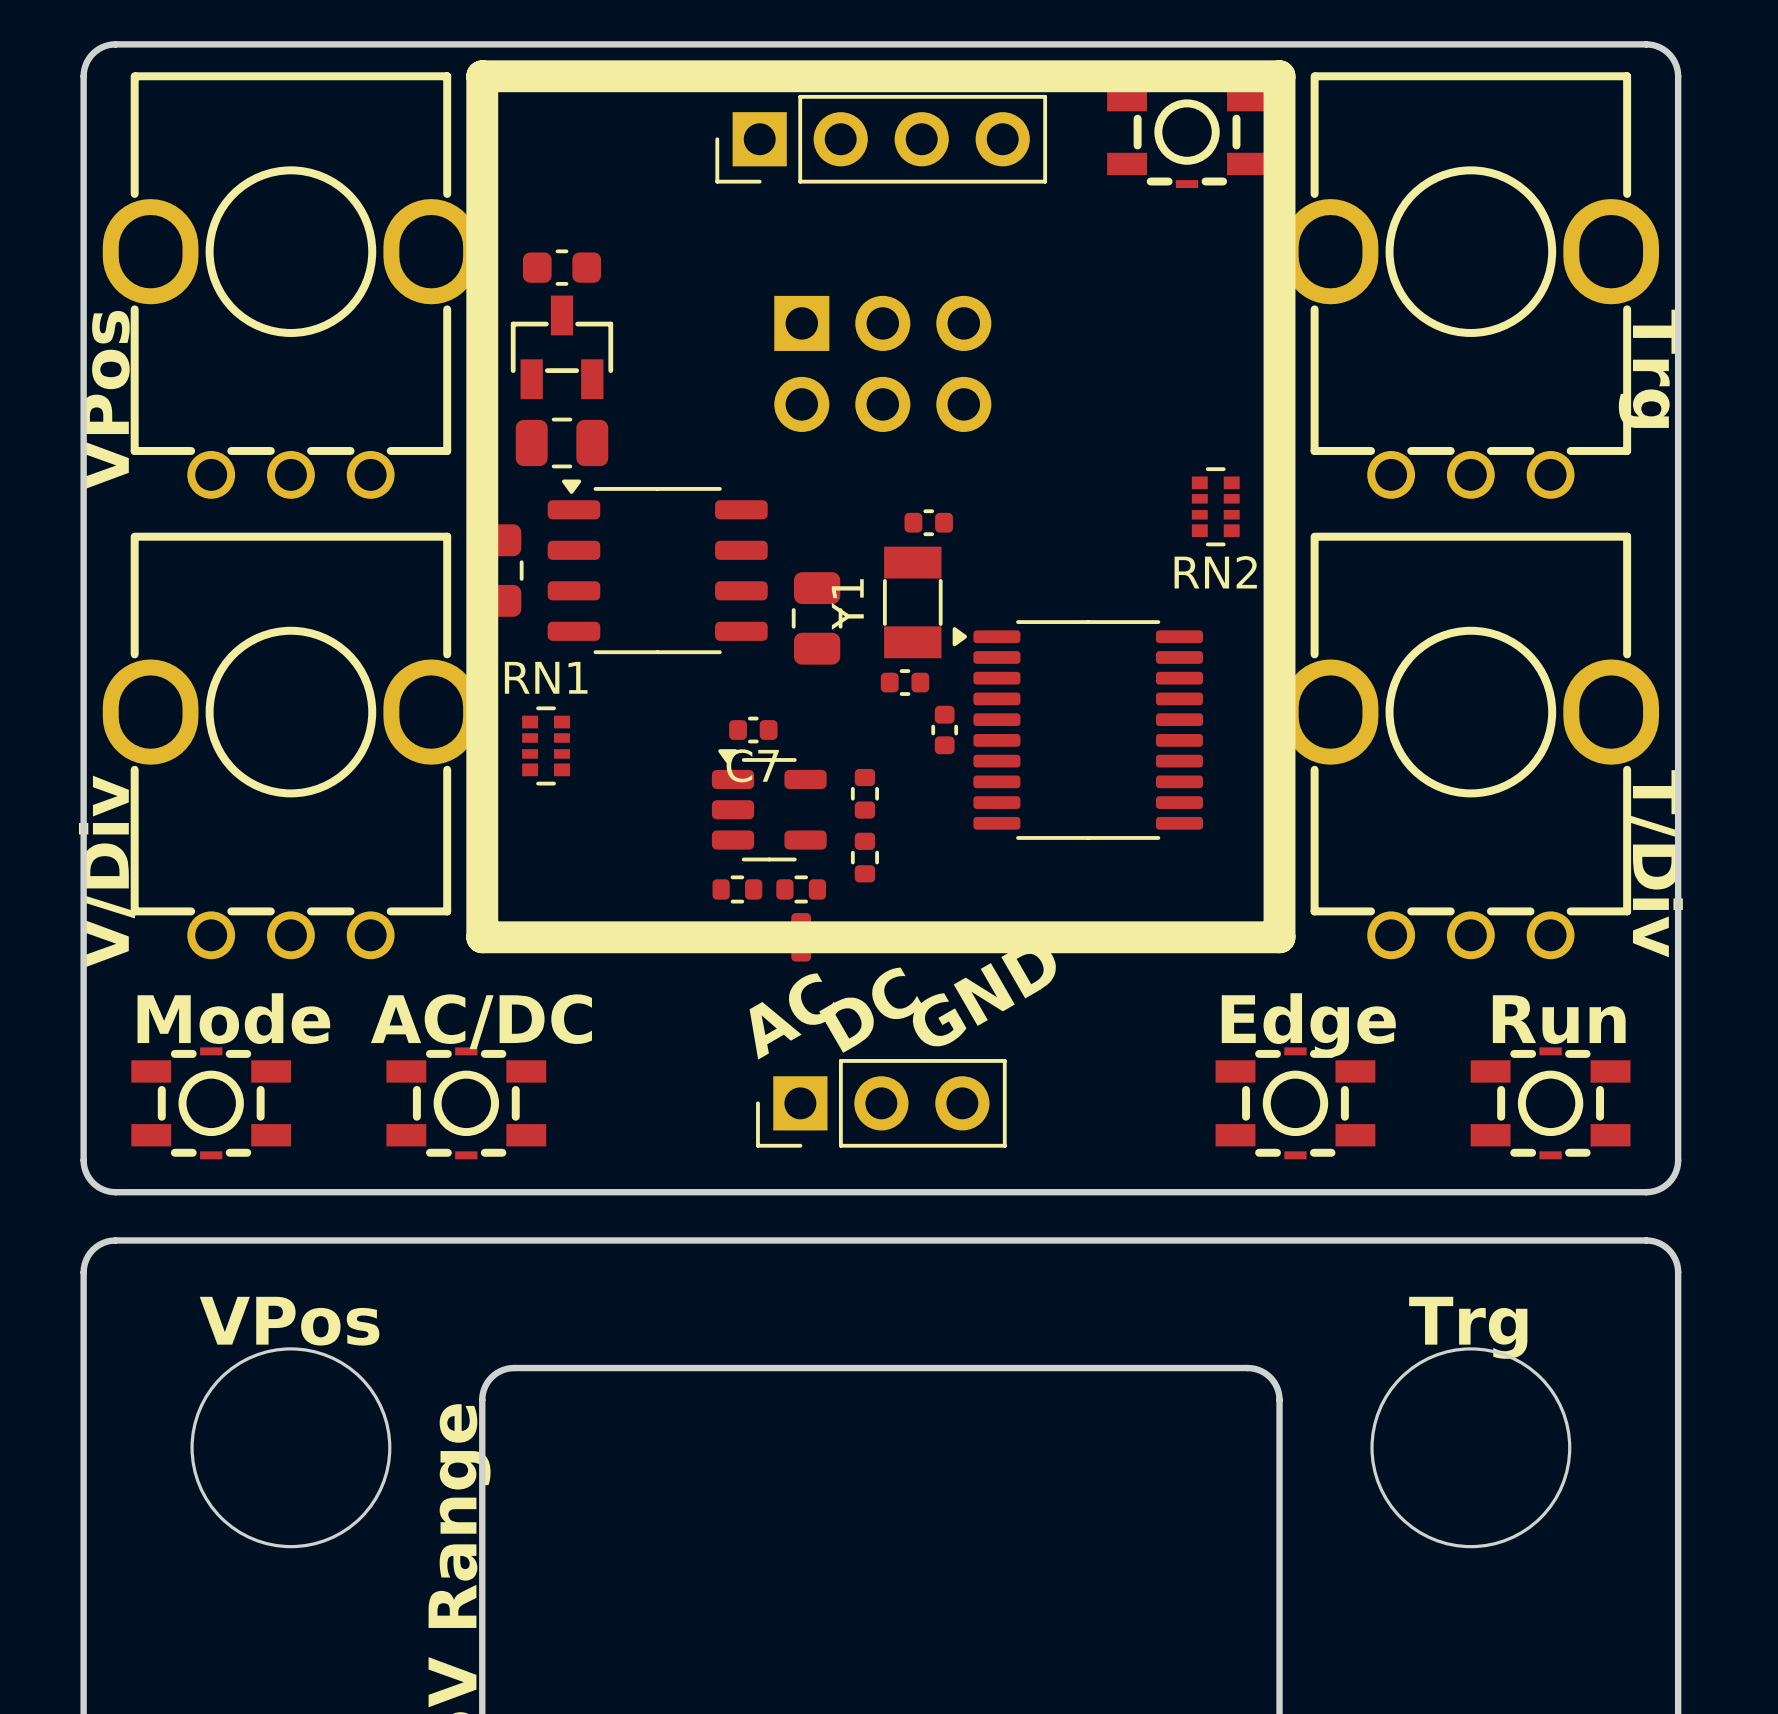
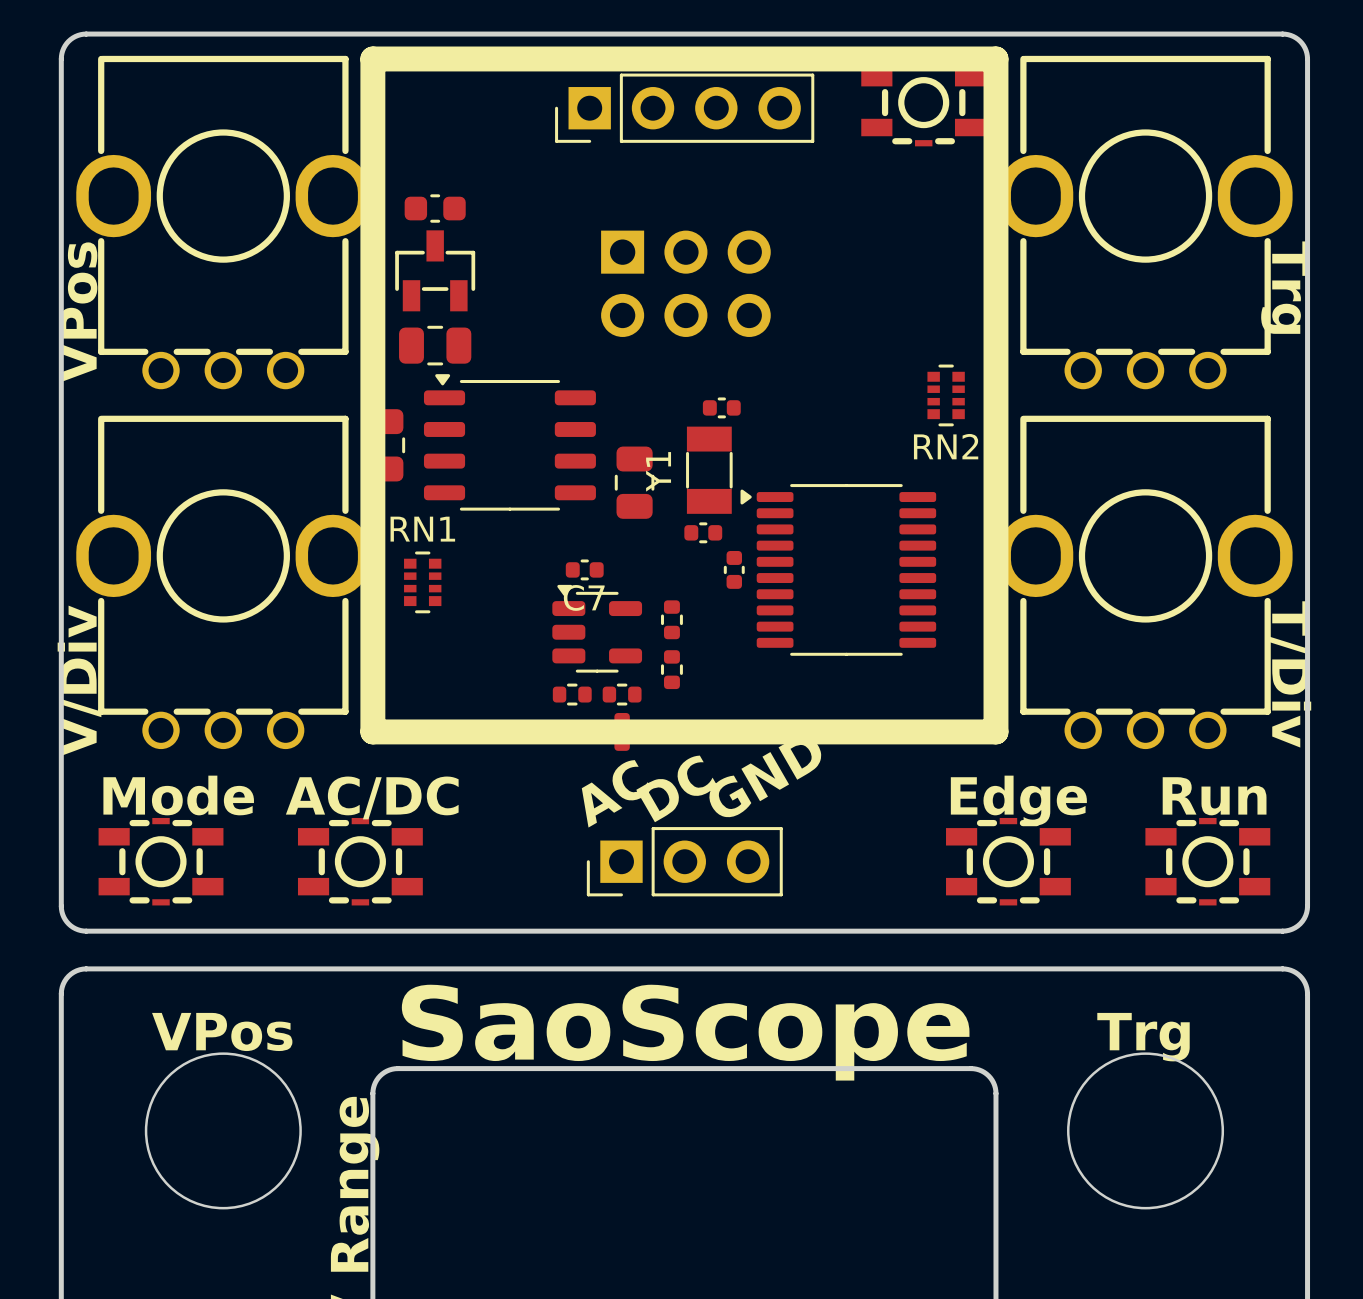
text: none -> SaoScope (685, 1032)

